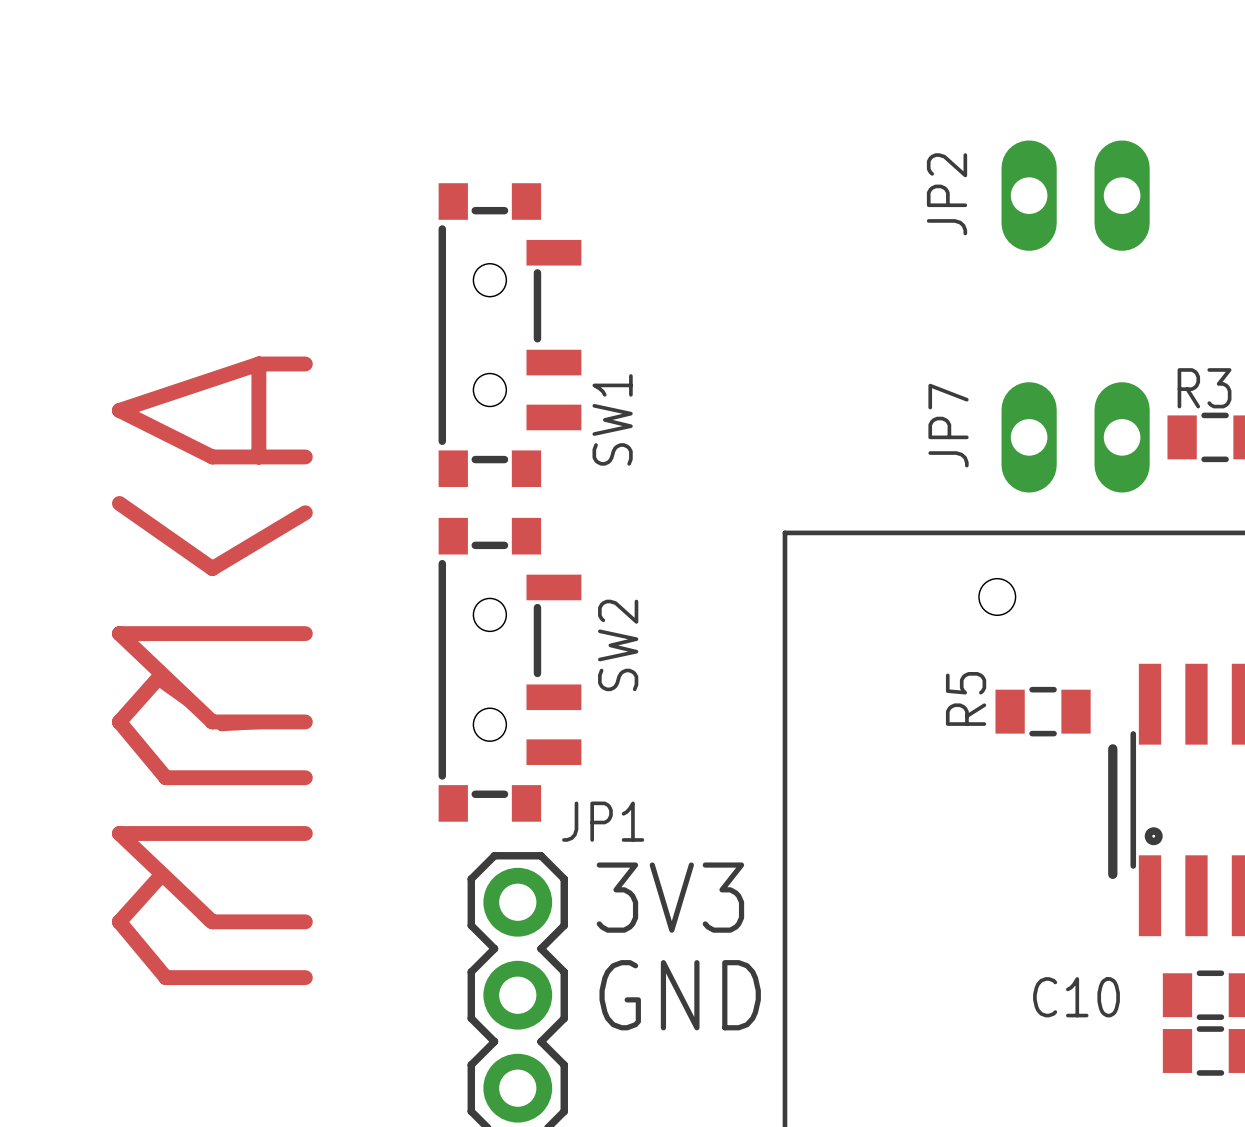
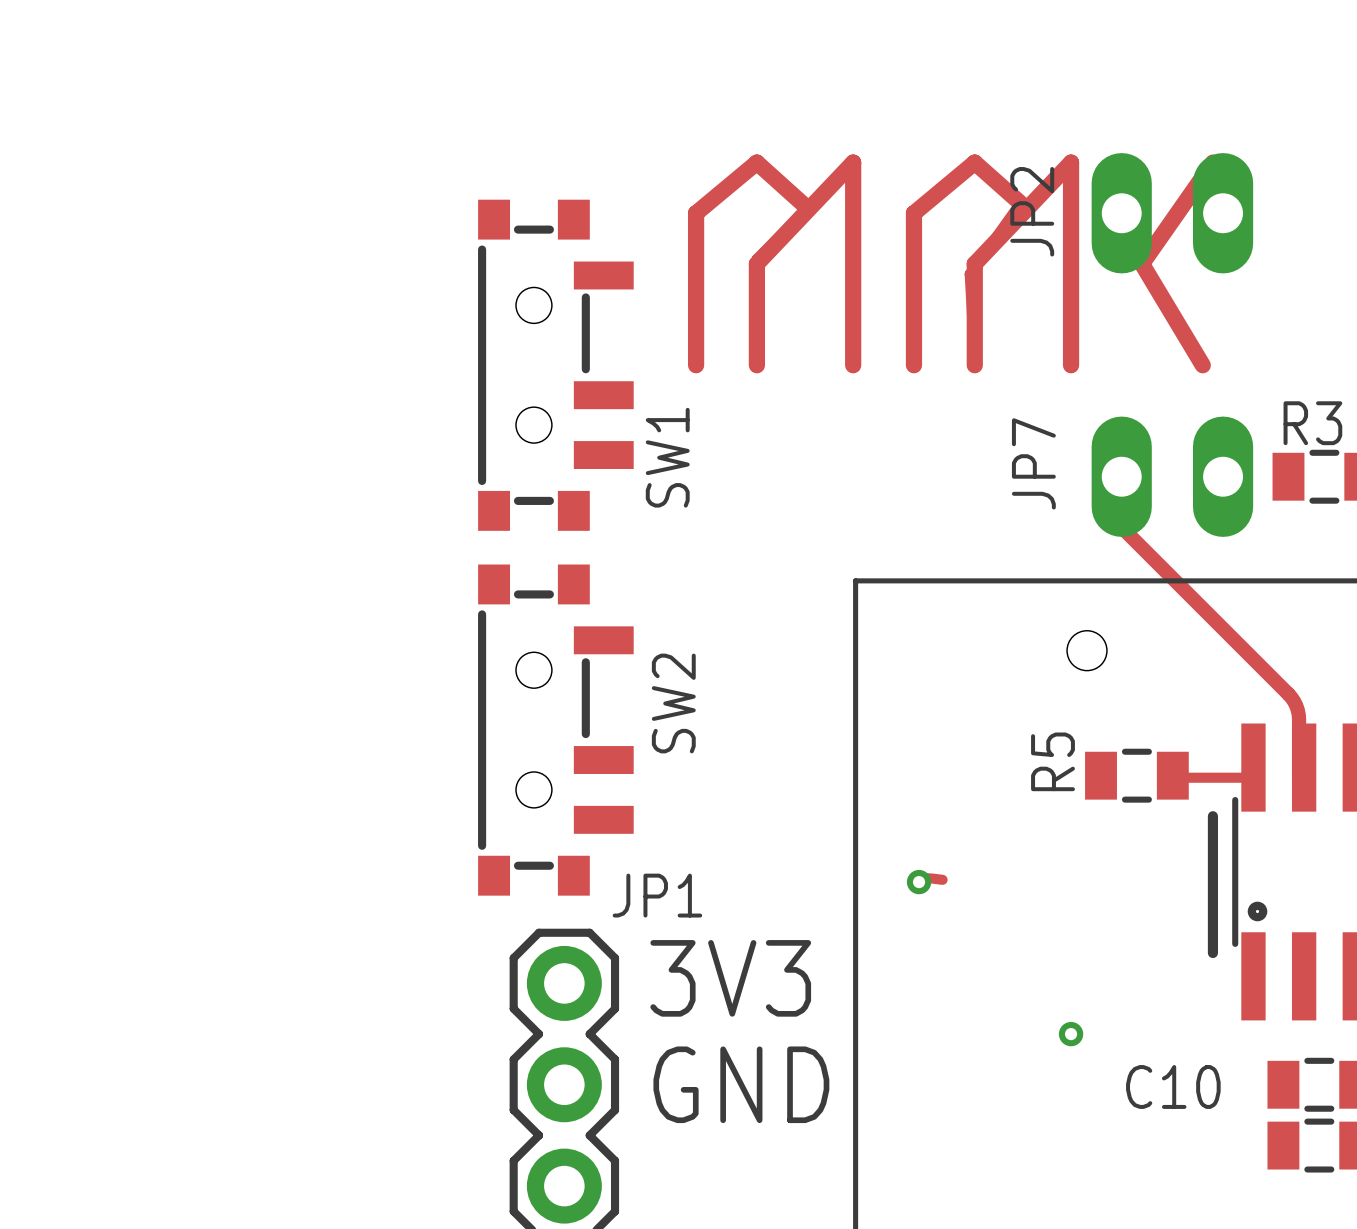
track: none -> (1212, 162) (1141, 263) (1202, 365)
track: none -> (696, 365) (696, 213) (756, 162) (807, 208) (756, 258) (756, 365) (756, 263) (853, 162) (853, 365)
track: none -> (913, 365) (913, 213) (974, 162) (1020, 203) (969, 274) (974, 365) (974, 263) (1071, 162) (1071, 365)
track: (258, 363) (119, 410) (212, 456) (305, 456) -> none
track: (258, 363) (305, 363) -> none
track: (258, 363) (258, 456) -> none
track: none -> (1121, 476) (1121, 527) (1294, 701) (1299, 719) (1299, 777)
track: (119, 503) (212, 568) (305, 512) -> none
track: (305, 633) (119, 633) (212, 721) (305, 721) (221, 726) (156, 680) (119, 721) (165, 777) (305, 777) -> none
track: none -> (1172, 775) (1184, 777) (1248, 777)
track: none -> (942, 879) (923, 877) (919, 882)
via: none -> (919, 882)
track: (305, 833) (119, 833) (212, 921) (305, 921) (207, 921) (161, 875) (119, 921) (165, 977) (305, 977) -> none
via: none -> (1071, 1034)

